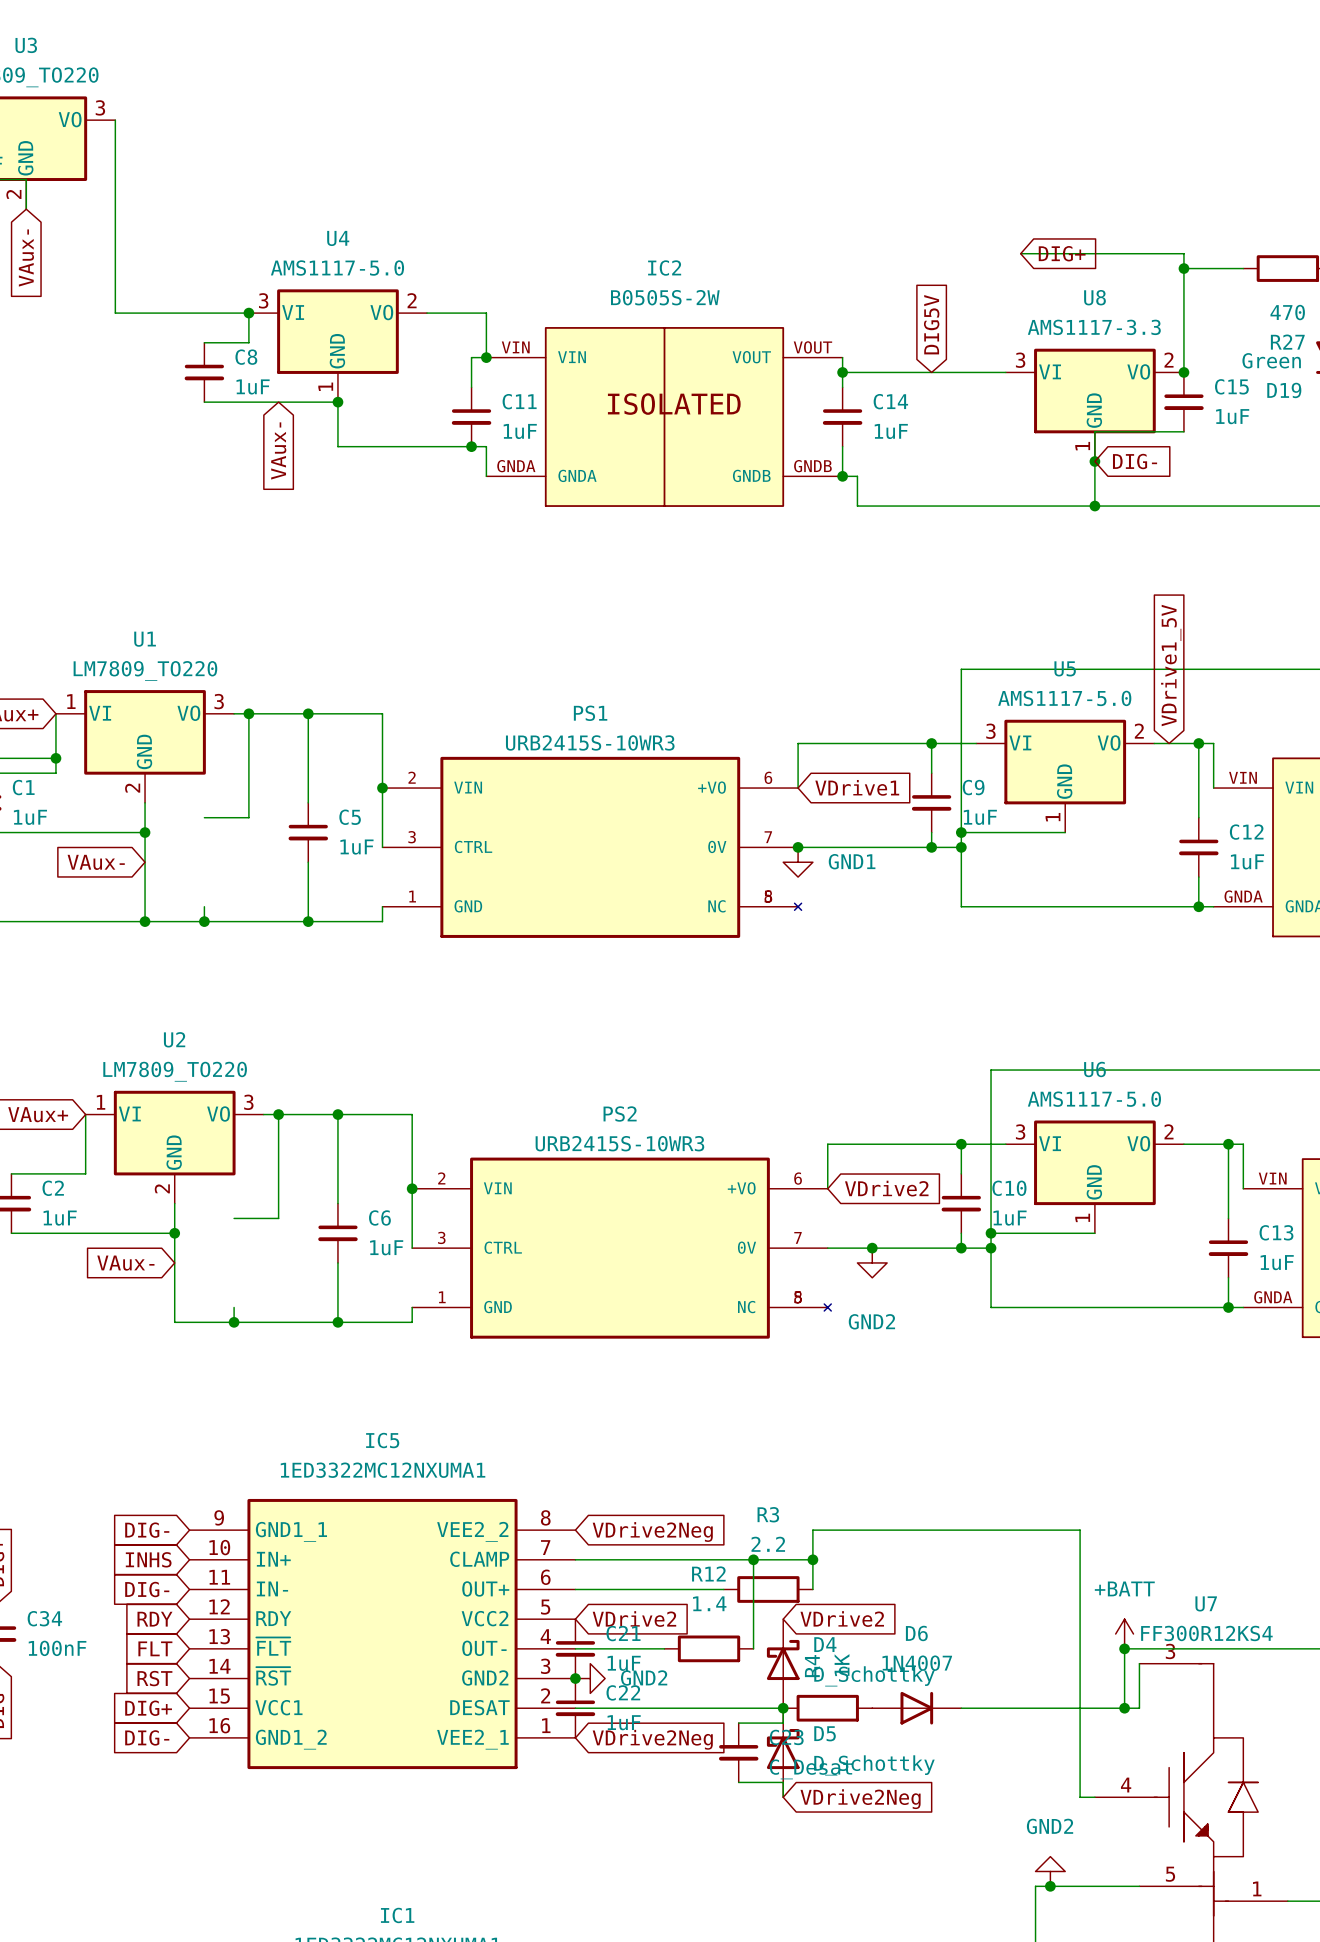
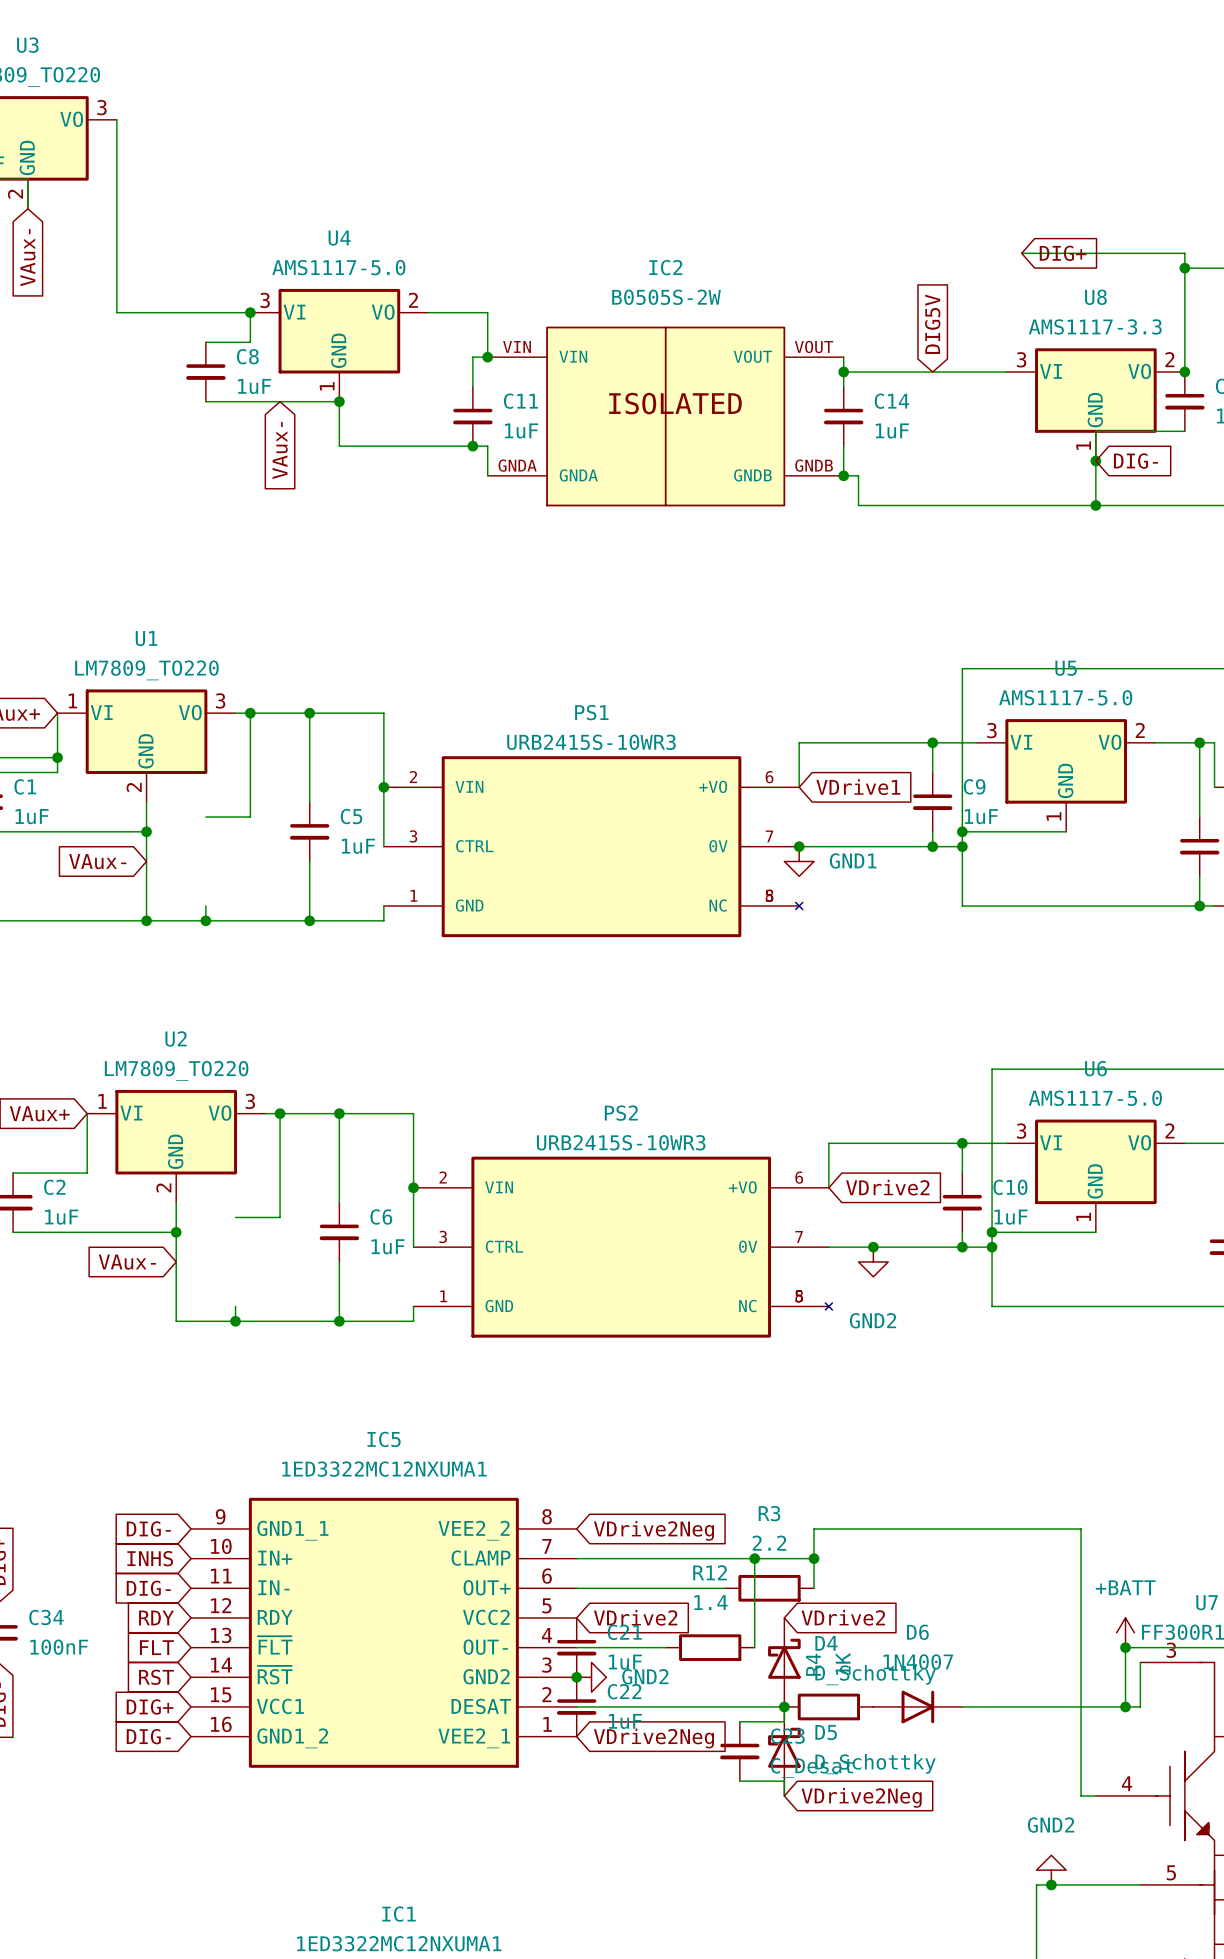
global label: VDrive1_5V (1171, 665) -> none

